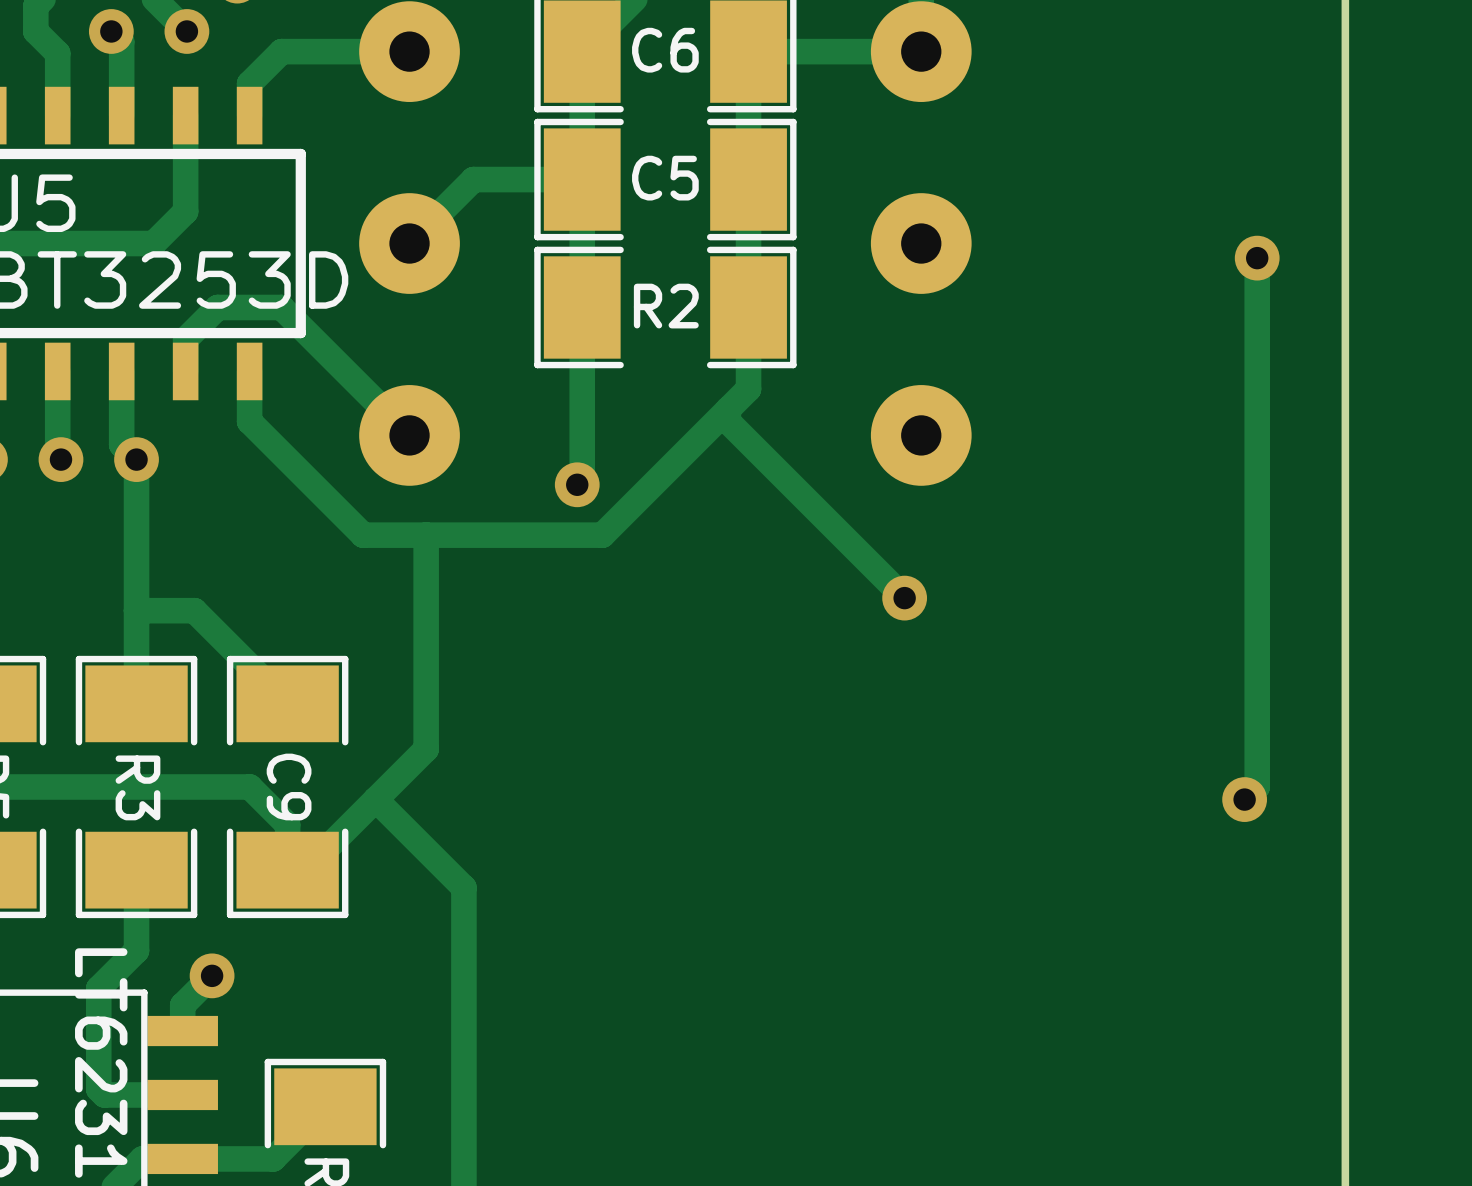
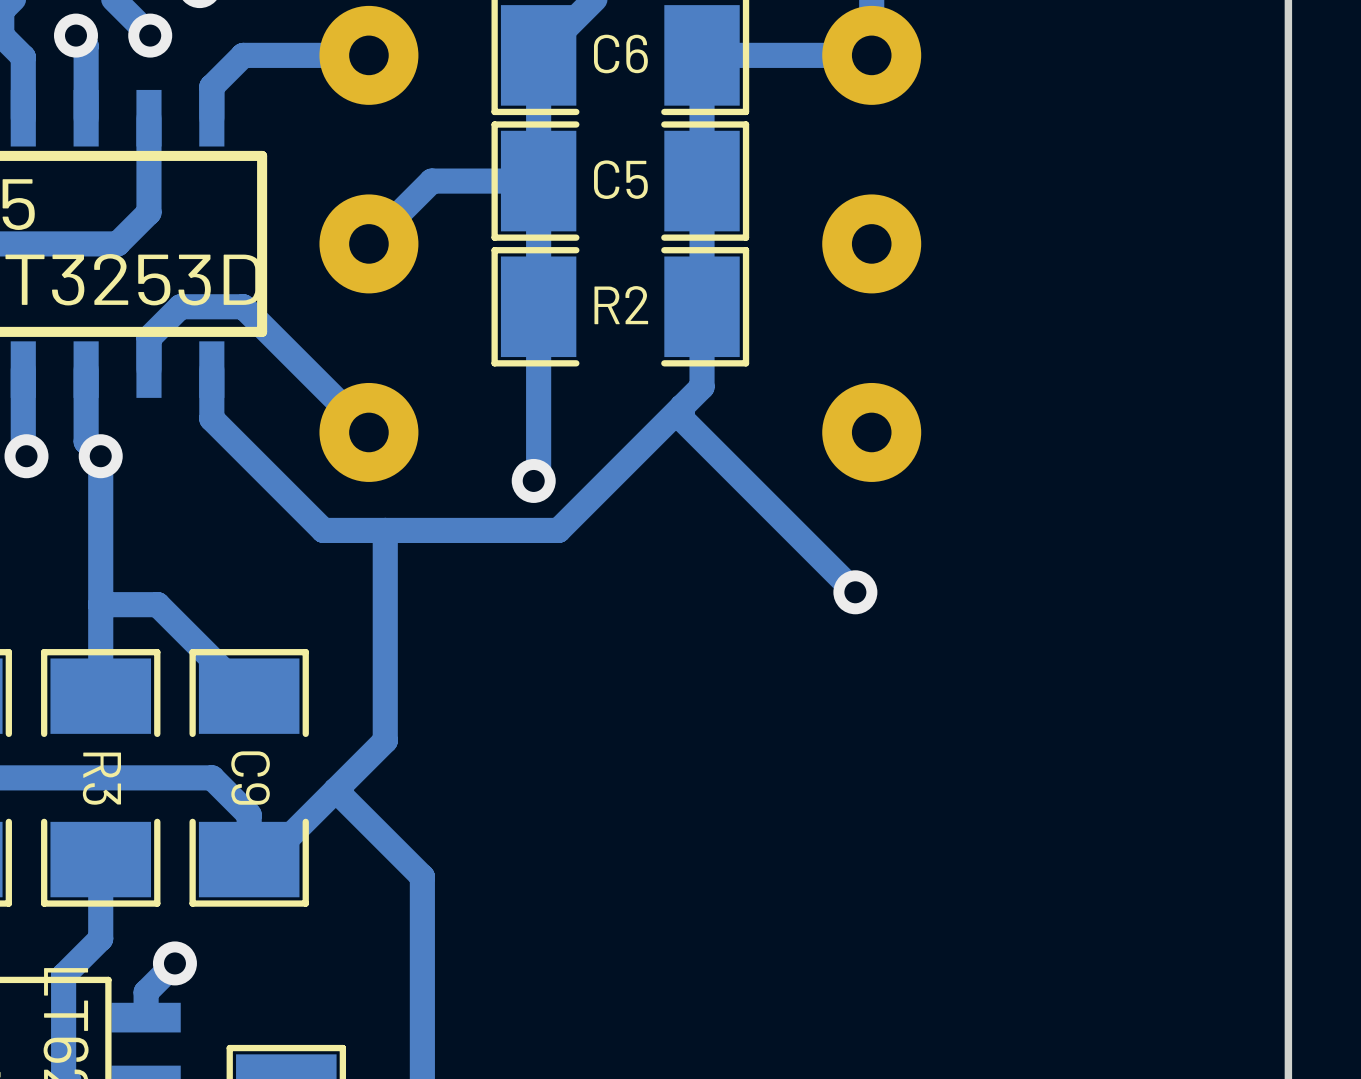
track: (1257, 258) (1257, 786) (1244, 799) -> none
via: (1257, 258) -> none
via: (1244, 799) -> none

